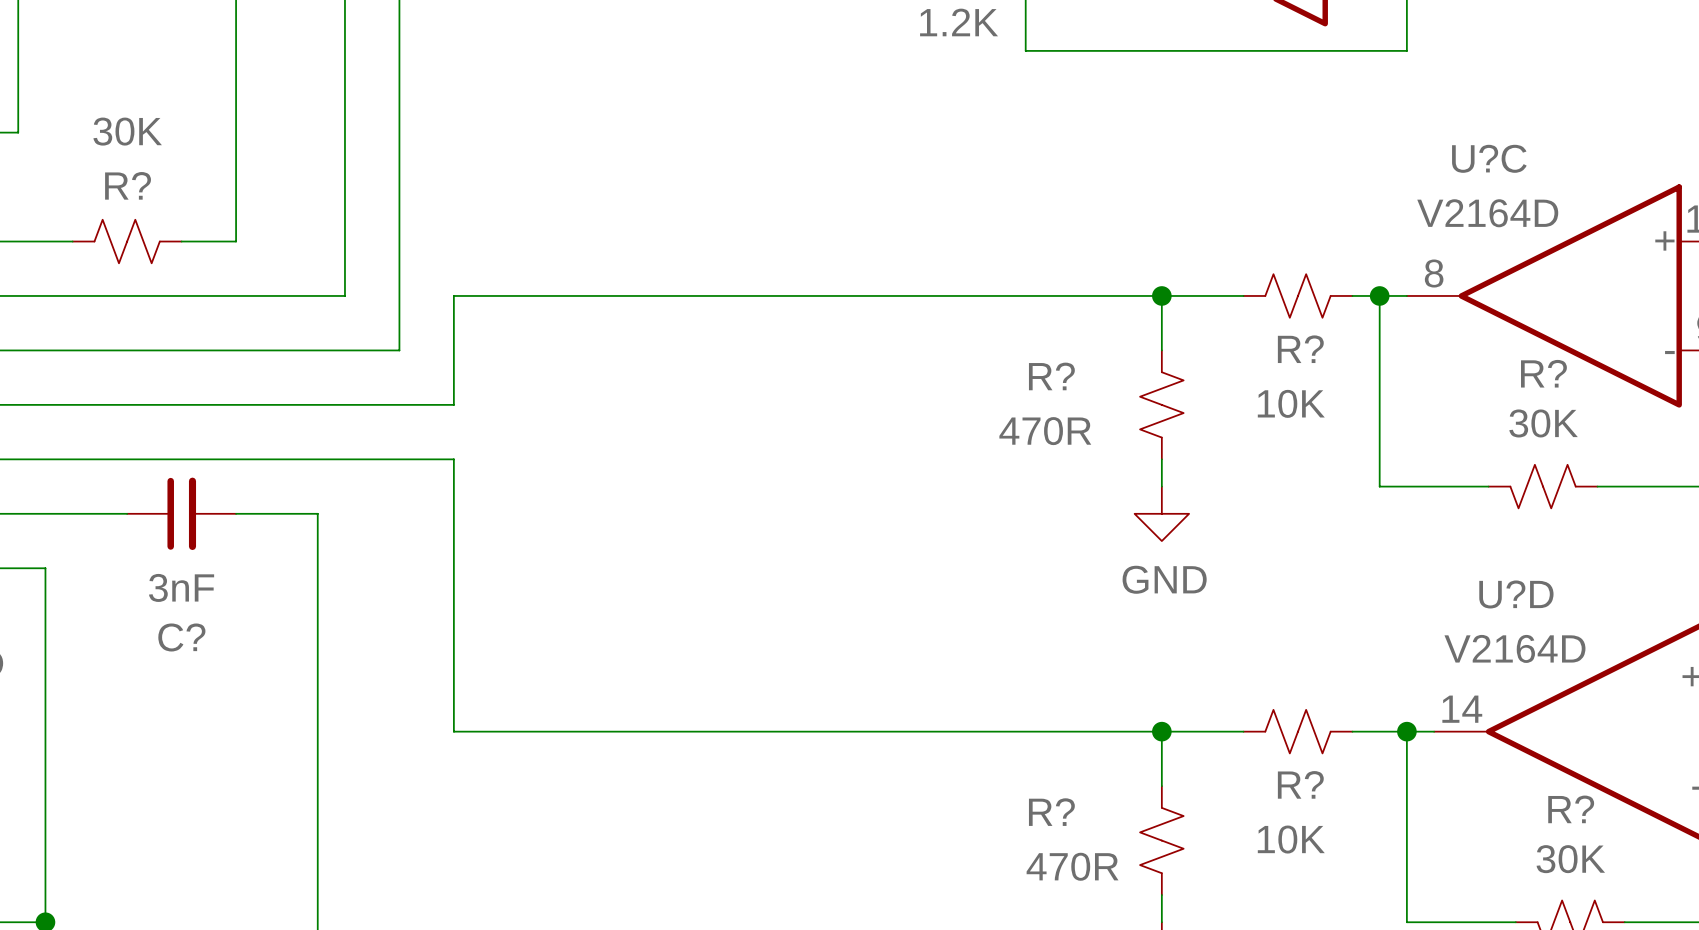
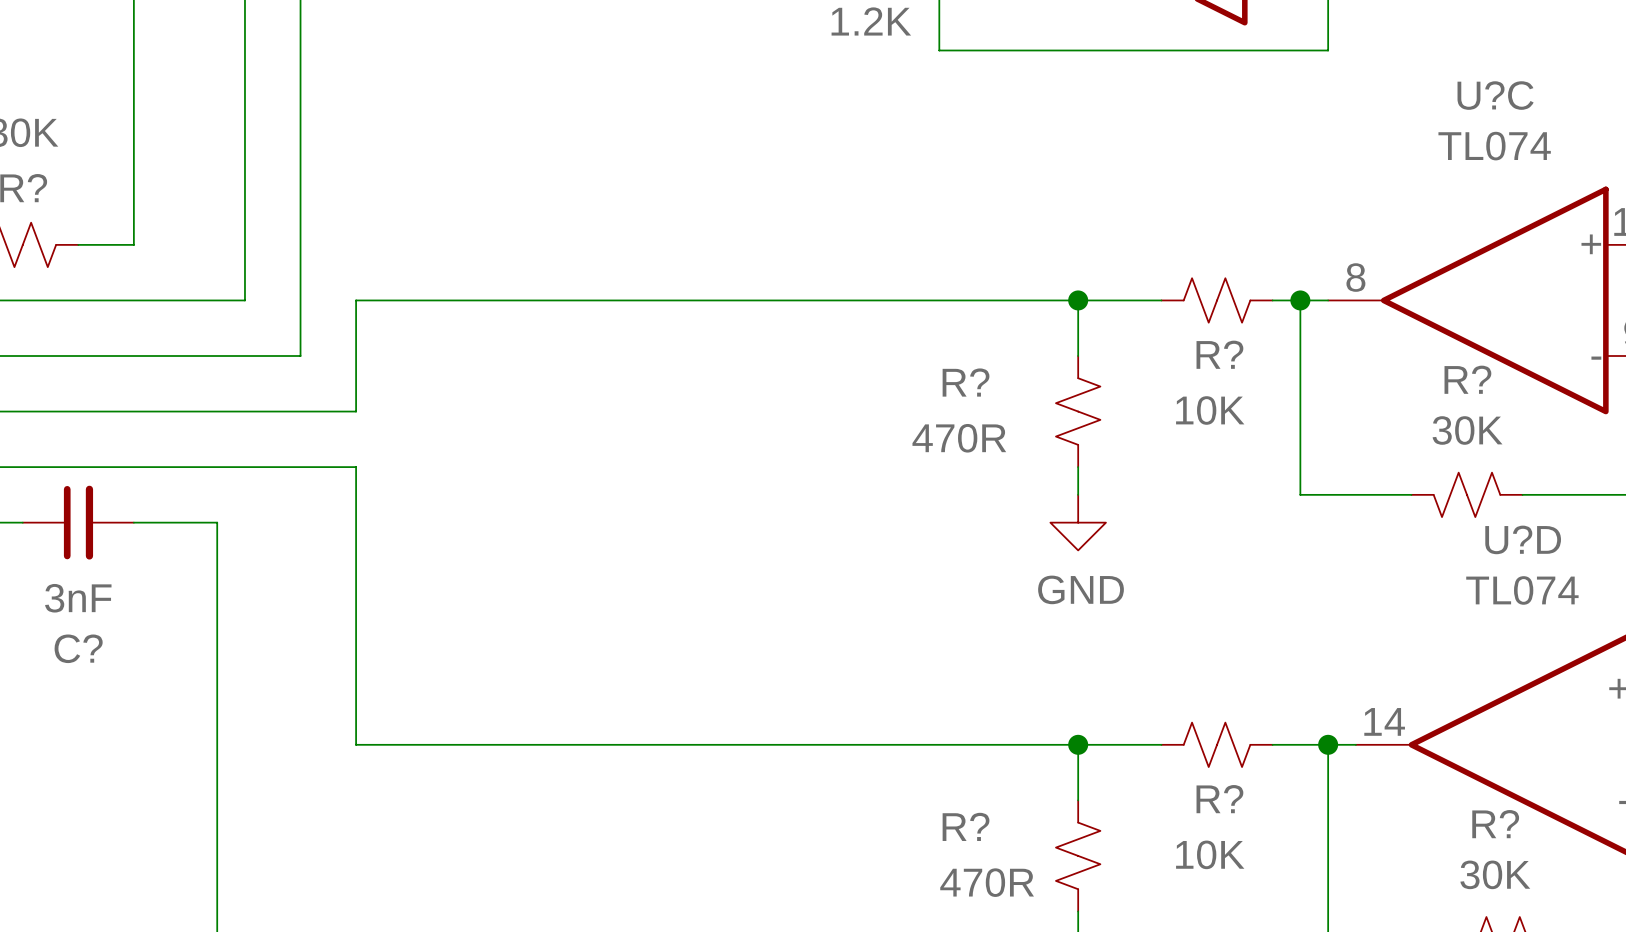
U?C name position: U?C (1489, 158) -> U?C (1495, 95)
U?C value: V2164D (1487, 213) -> TL074 (1494, 146)
U?D name position: U?D (1516, 594) -> U?D (1523, 539)
U?D value: V2164D (1514, 648) -> TL074 (1522, 590)

